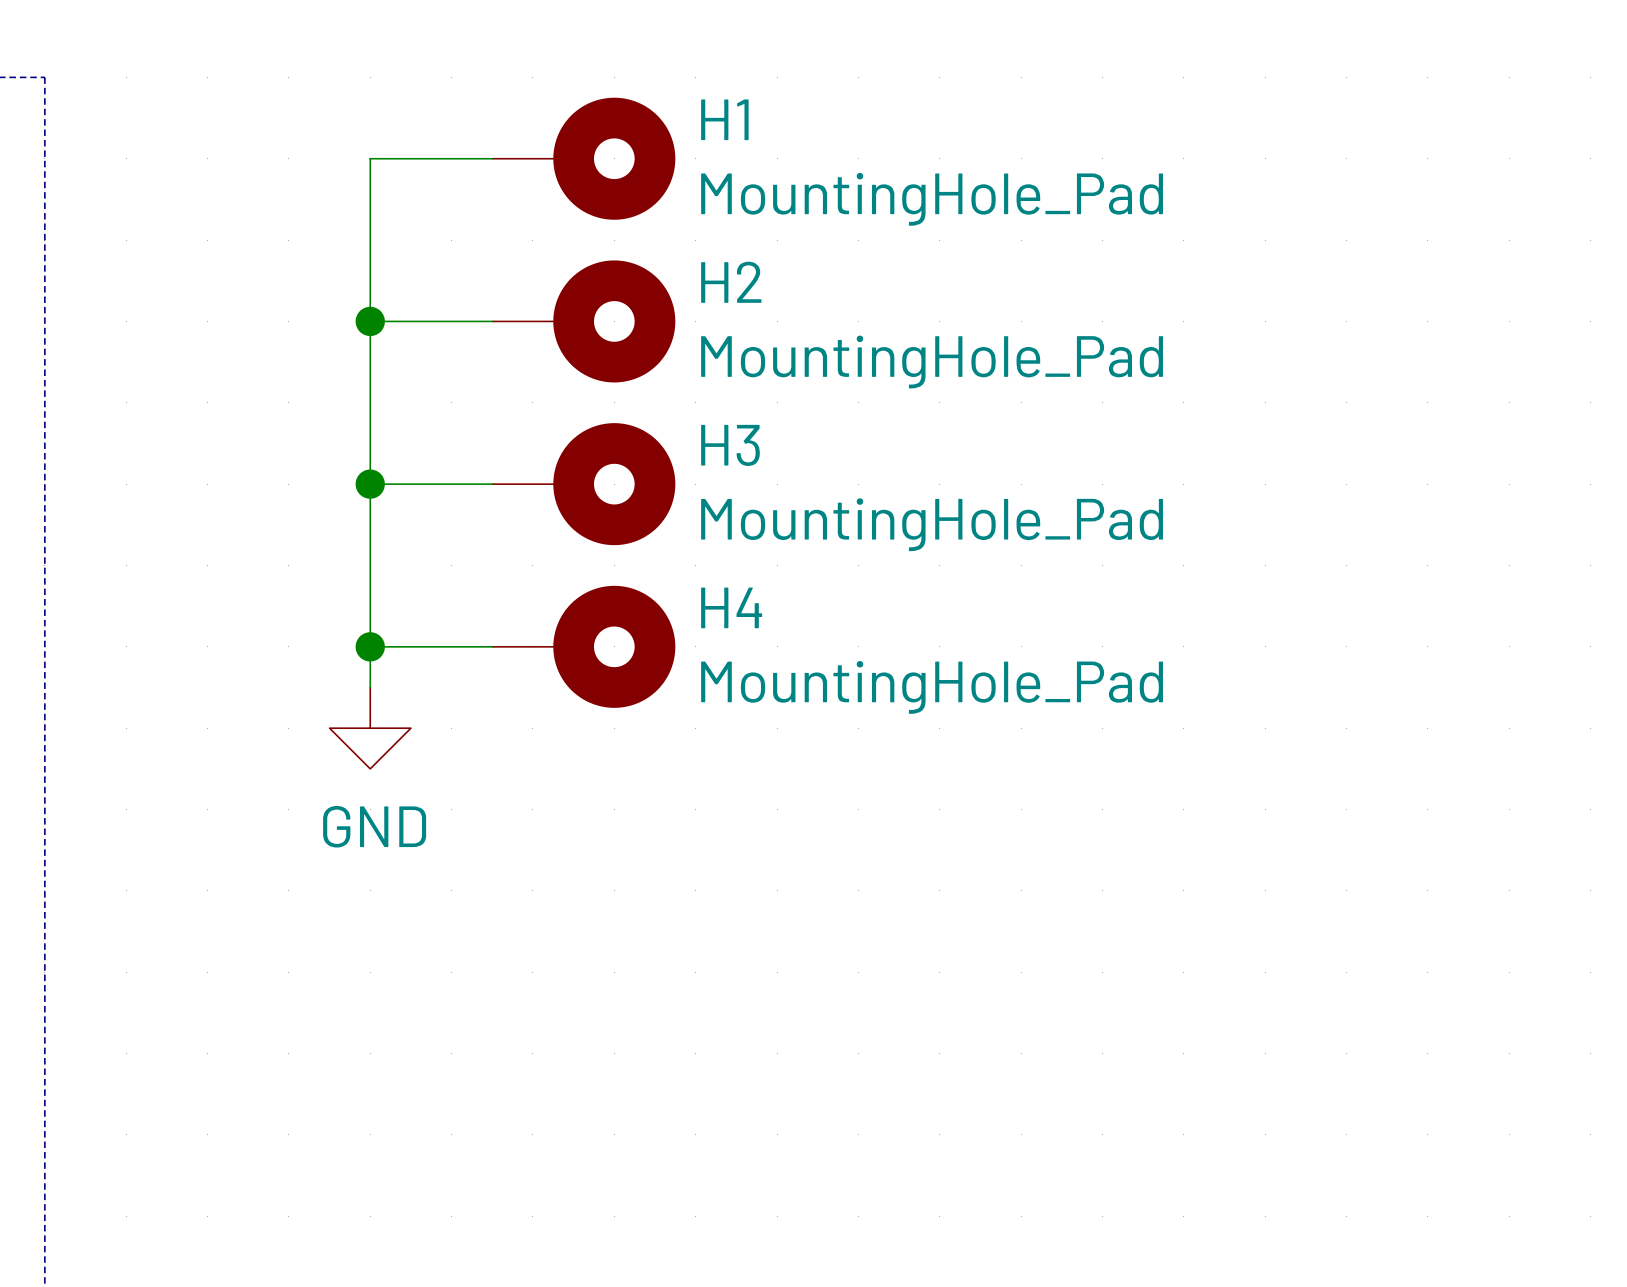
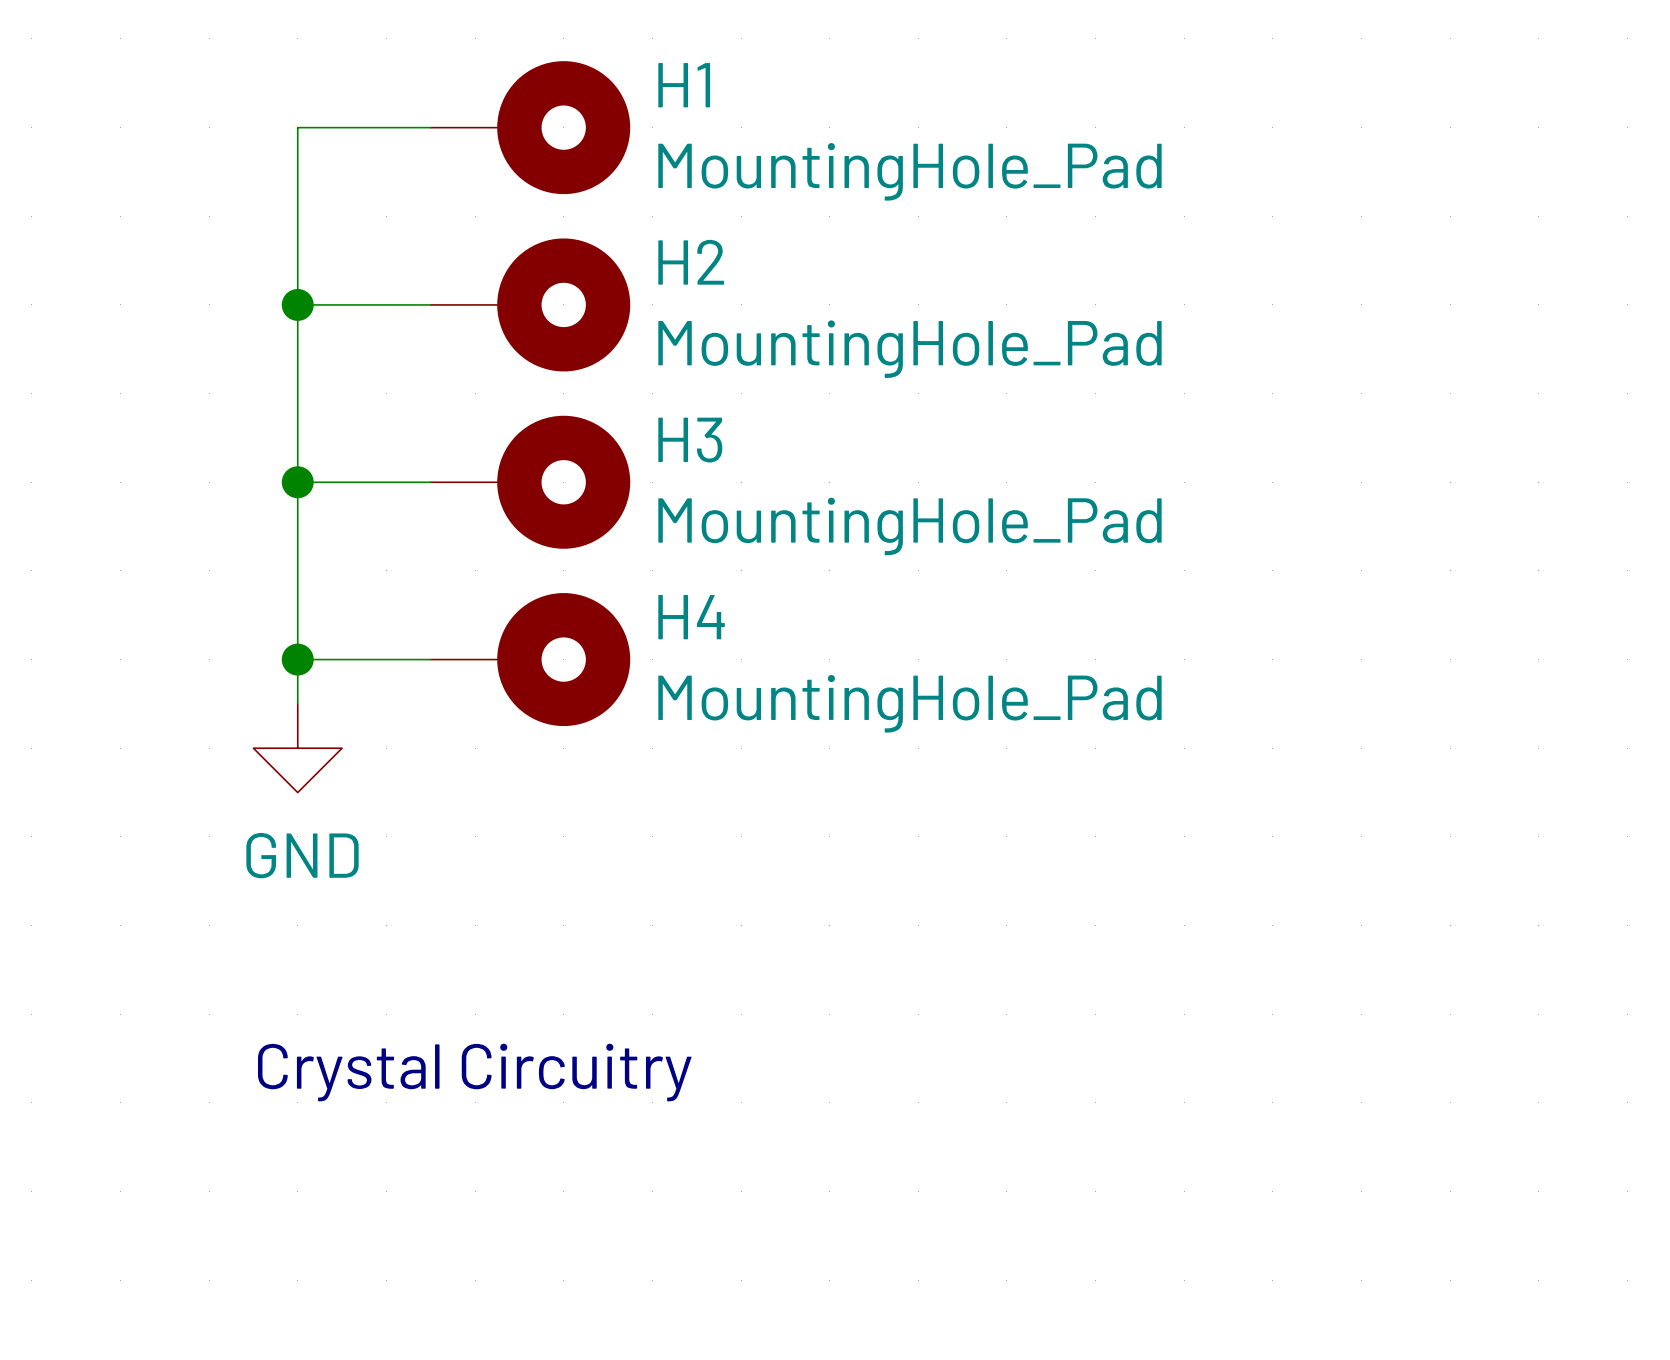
text: none -> Crystal Circuitry (474, 1072)

